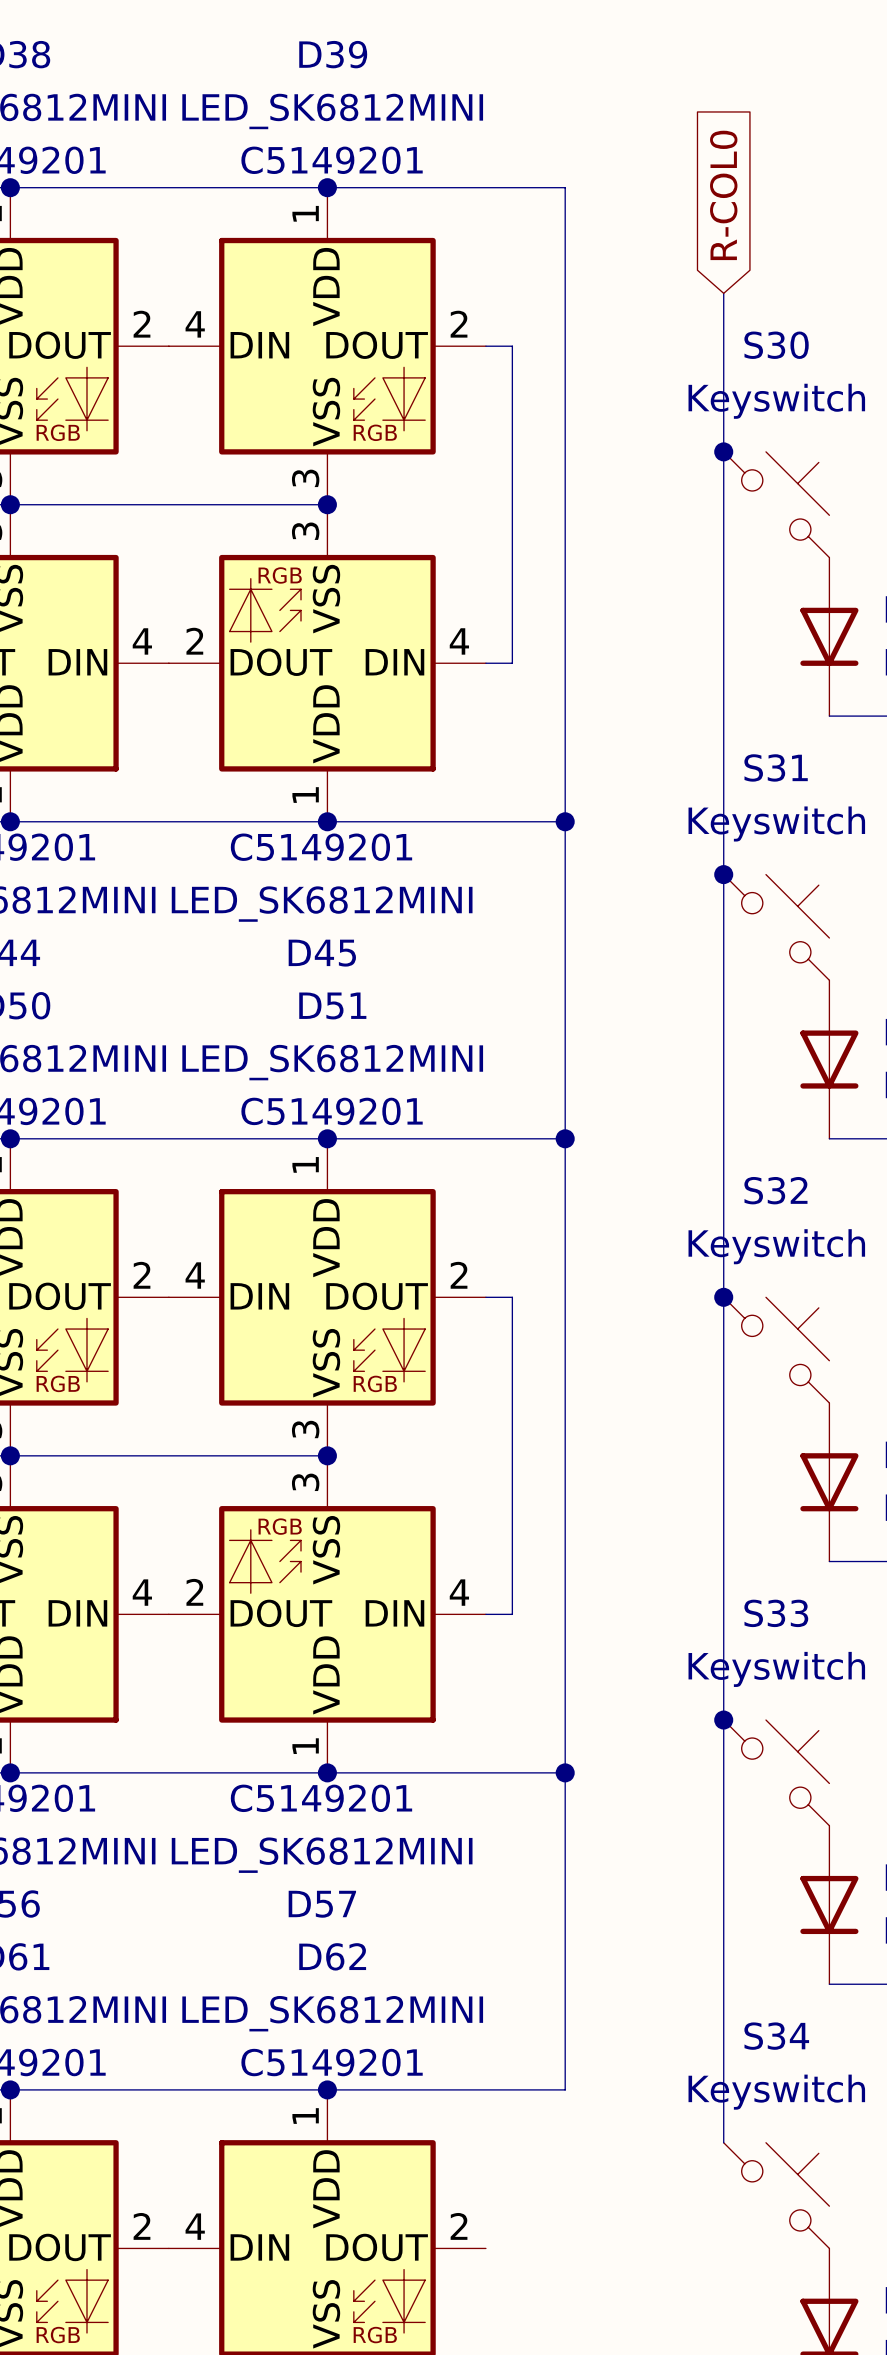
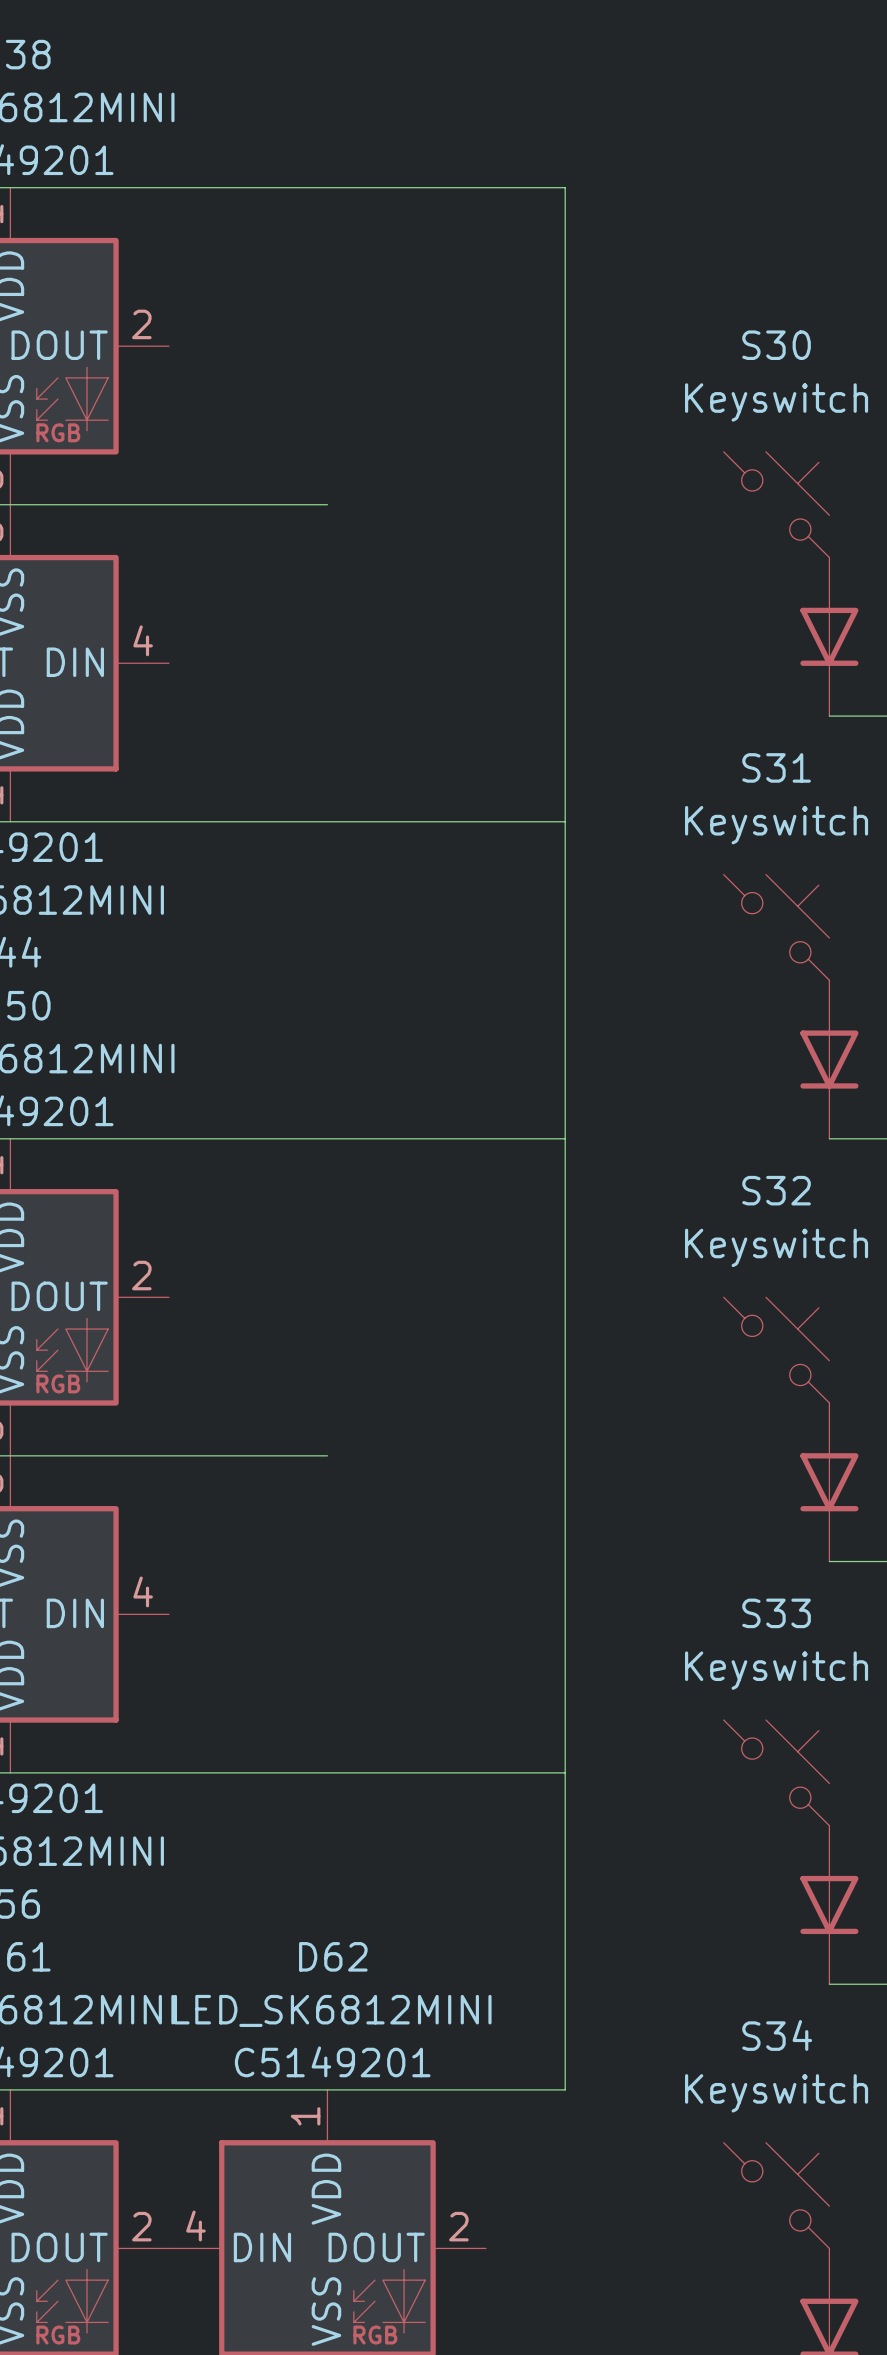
junction: (10, 187) -> none
junction: (327, 187) -> none
global label: R-COL0 (723, 195) -> none
wire: (723, 293) (723, 2142) -> none
D39: LED_SK6812MINI (327, 346) -> none
wire: (485, 346) (512, 346) (512, 663) (485, 663) -> none
junction: (723, 451) -> none
junction: (10, 504) -> none
junction: (327, 504) -> none
D45: LED_SK6812MINI (327, 663) -> none
junction: (10, 821) -> none
junction: (327, 821) -> none
junction: (565, 821) -> none
junction: (723, 874) -> none
junction: (10, 1138) -> none
junction: (327, 1138) -> none
junction: (565, 1138) -> none
D51: LED_SK6812MINI (327, 1297) -> none
wire: (485, 1297) (512, 1297) (512, 1614) (485, 1614) -> none
junction: (723, 1297) -> none
junction: (10, 1455) -> none
junction: (327, 1455) -> none
D57: LED_SK6812MINI (327, 1614) -> none
junction: (723, 1720) -> none
junction: (10, 1772) -> none
junction: (327, 1772) -> none
junction: (565, 1772) -> none
junction: (10, 2089) -> none
junction: (327, 2089) -> none

